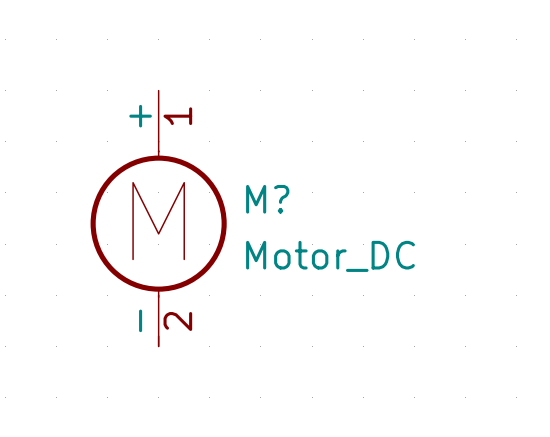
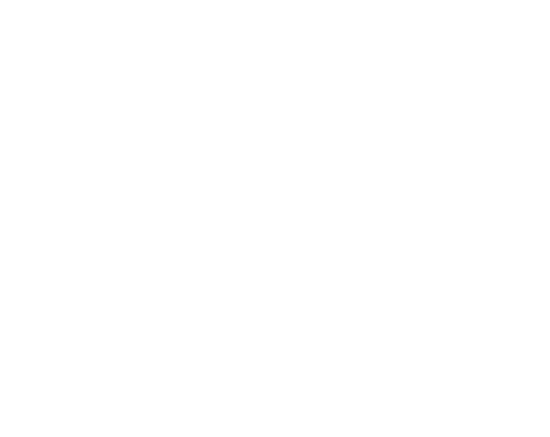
M?: Motor_DC (158, 218) -> none

